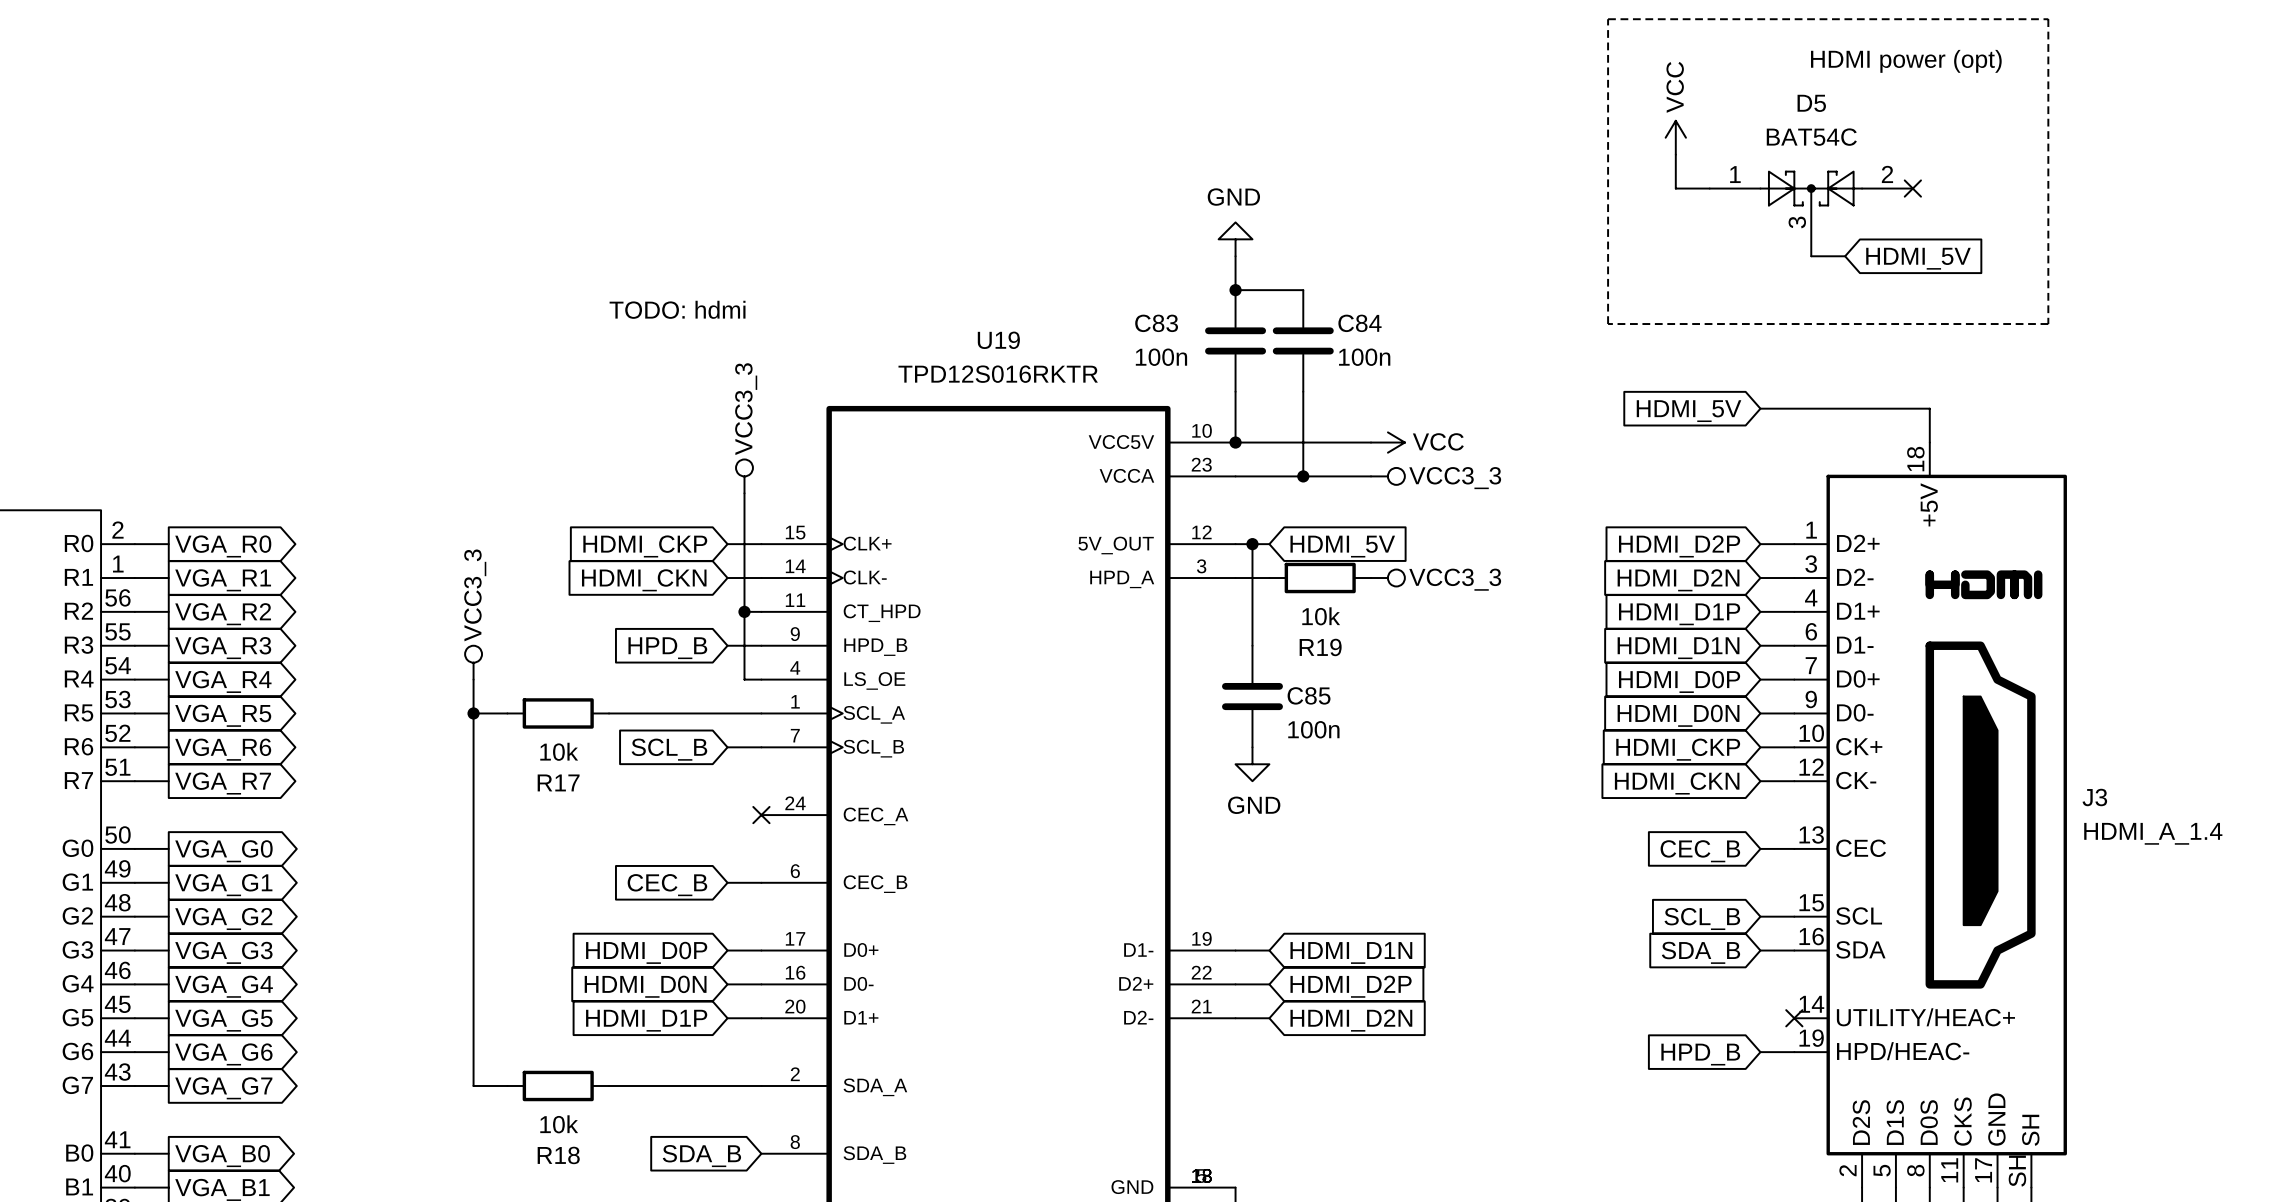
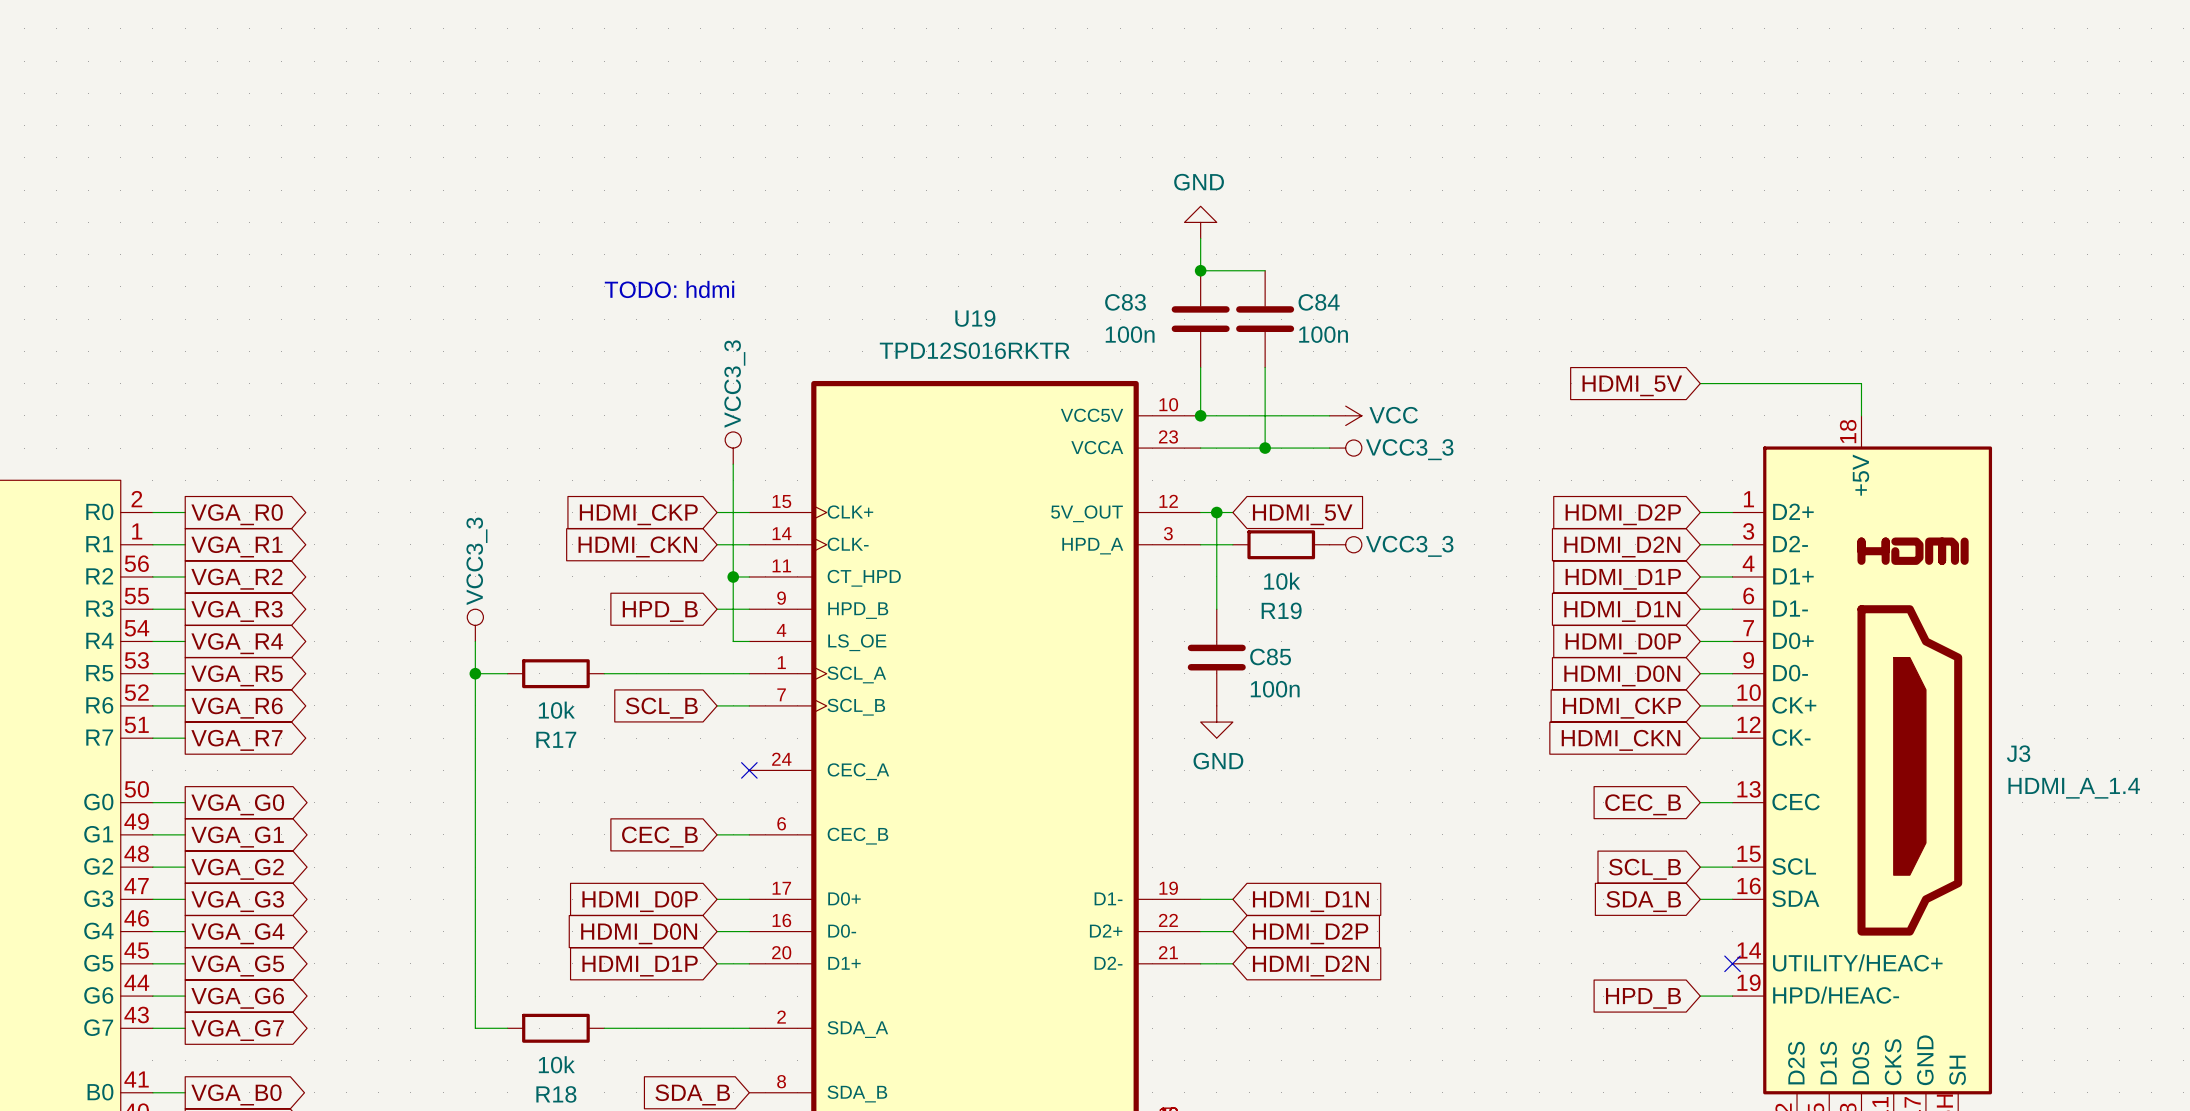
line: (1608, 19) (2048, 19) (2048, 324) (1608, 324) (1608, 19) -> none
text: HDMI power (opt) (1906, 61) -> none
power symbol: VCC (1675, 137) -> none
wire: (1675, 154) (1675, 188) (1709, 188) -> none
no-connect mark: (1912, 188) -> none
D5: BAT54C (1811, 213) -> none
wire: (1811, 256) (1845, 256) -> none
global label: HDMI_5V (1918, 258) -> none

